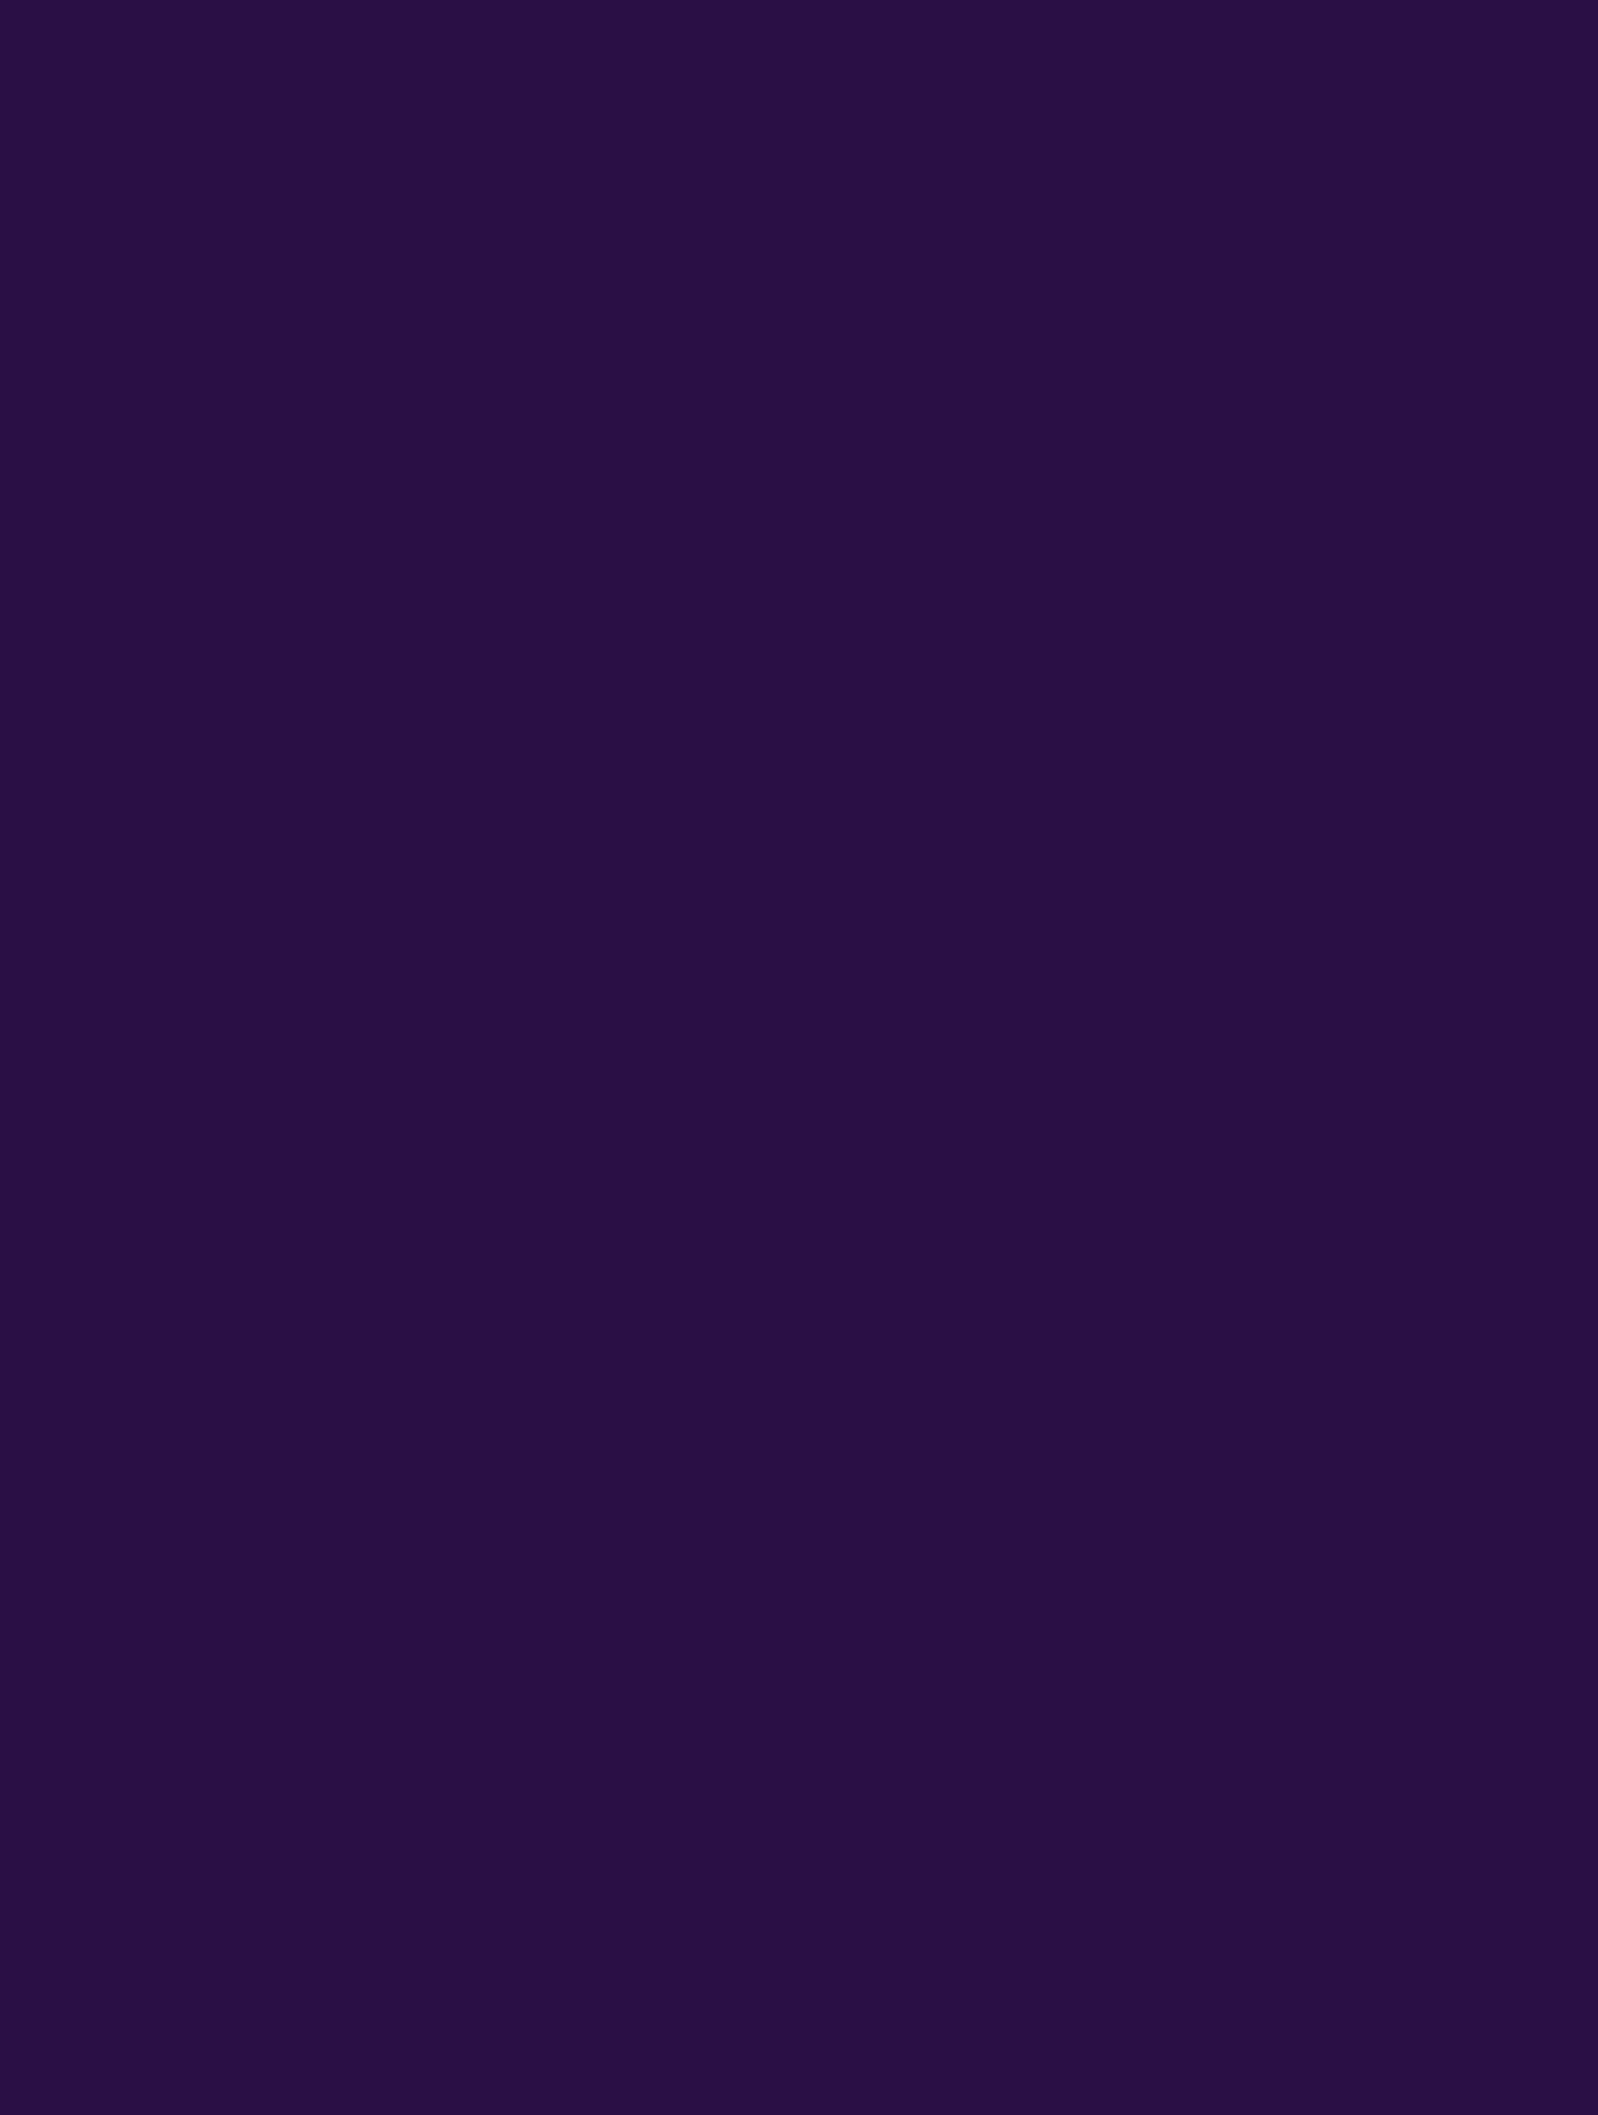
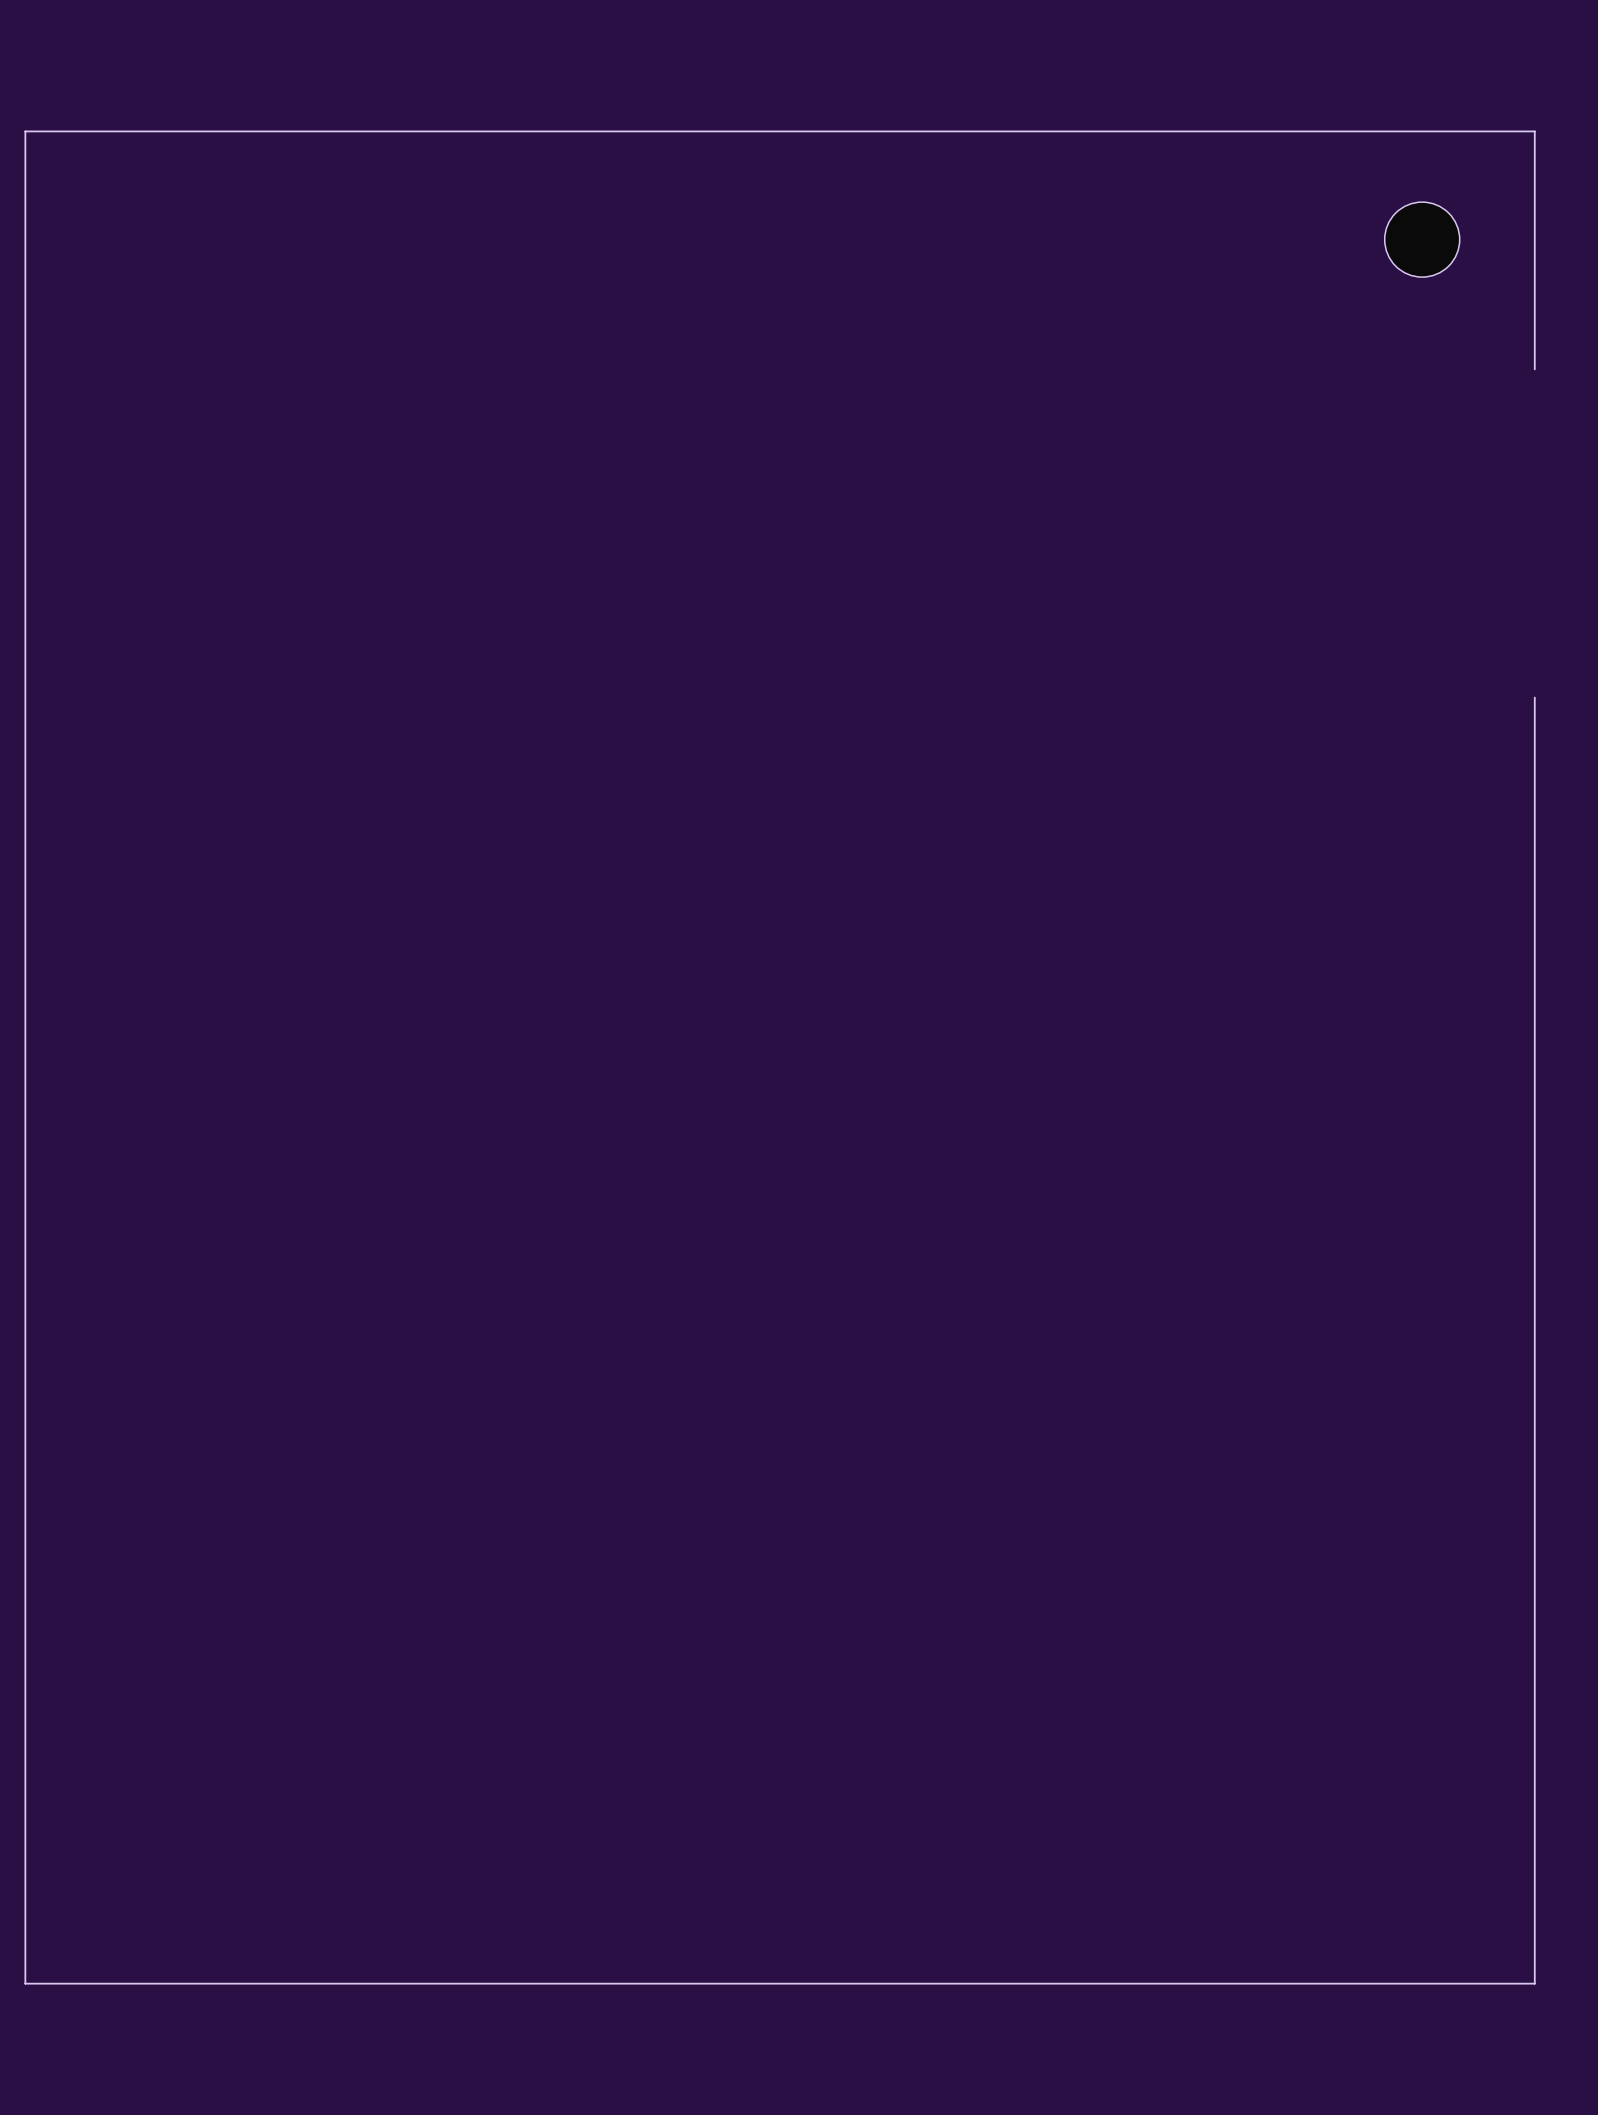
part: none -> (1422, 239)
board edge: none -> (1534, 369) (1534, 131) (25, 131) (25, 1983) (1534, 1983) (1534, 697)

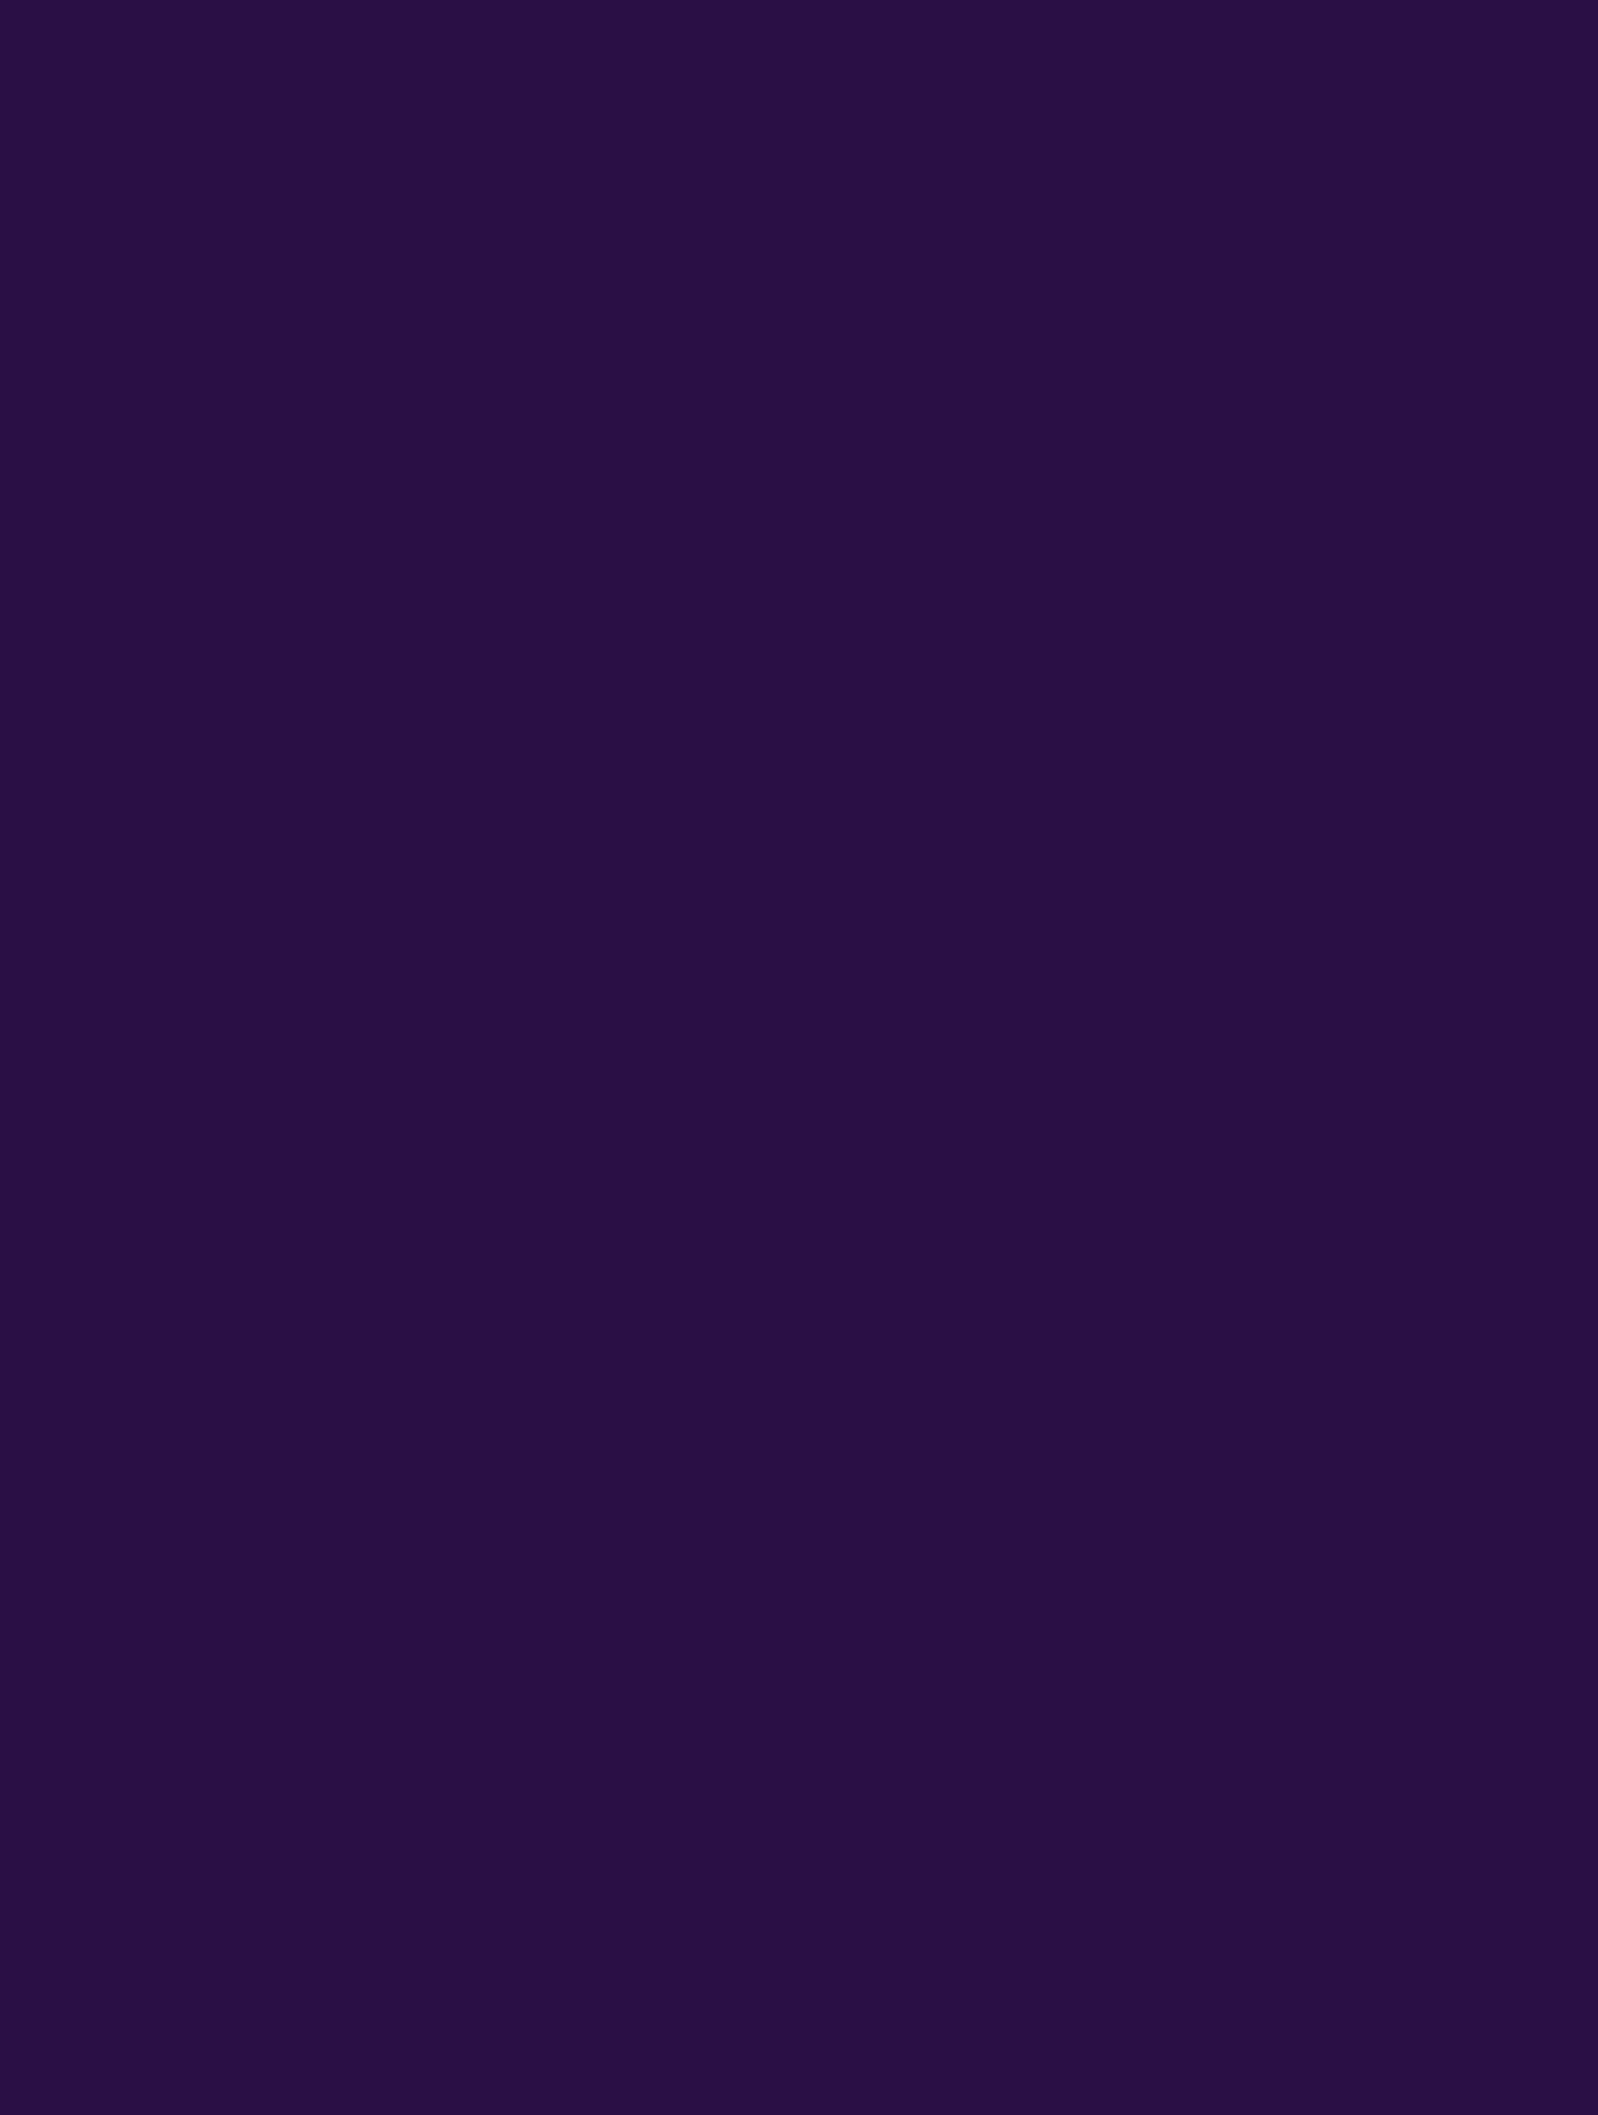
part: (1422, 239) -> none
board edge: (1534, 369) (1534, 131) (25, 131) (25, 1983) (1534, 1983) (1534, 697) -> none

